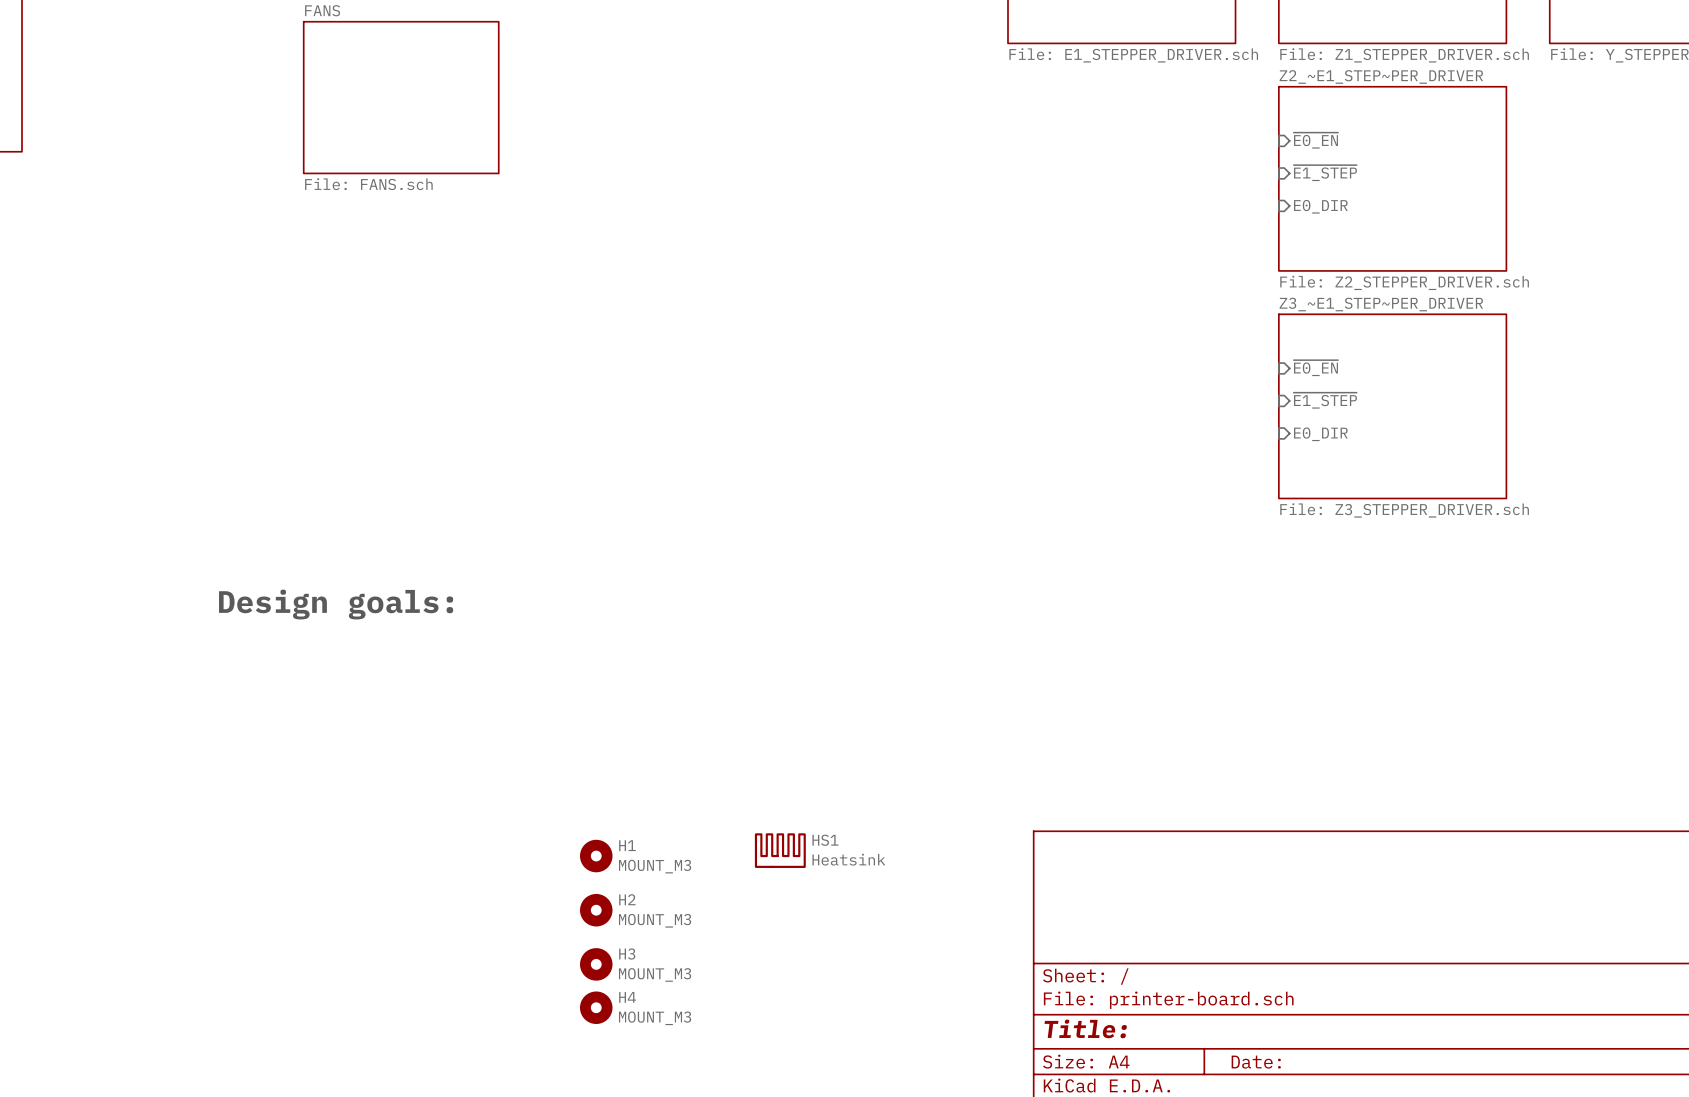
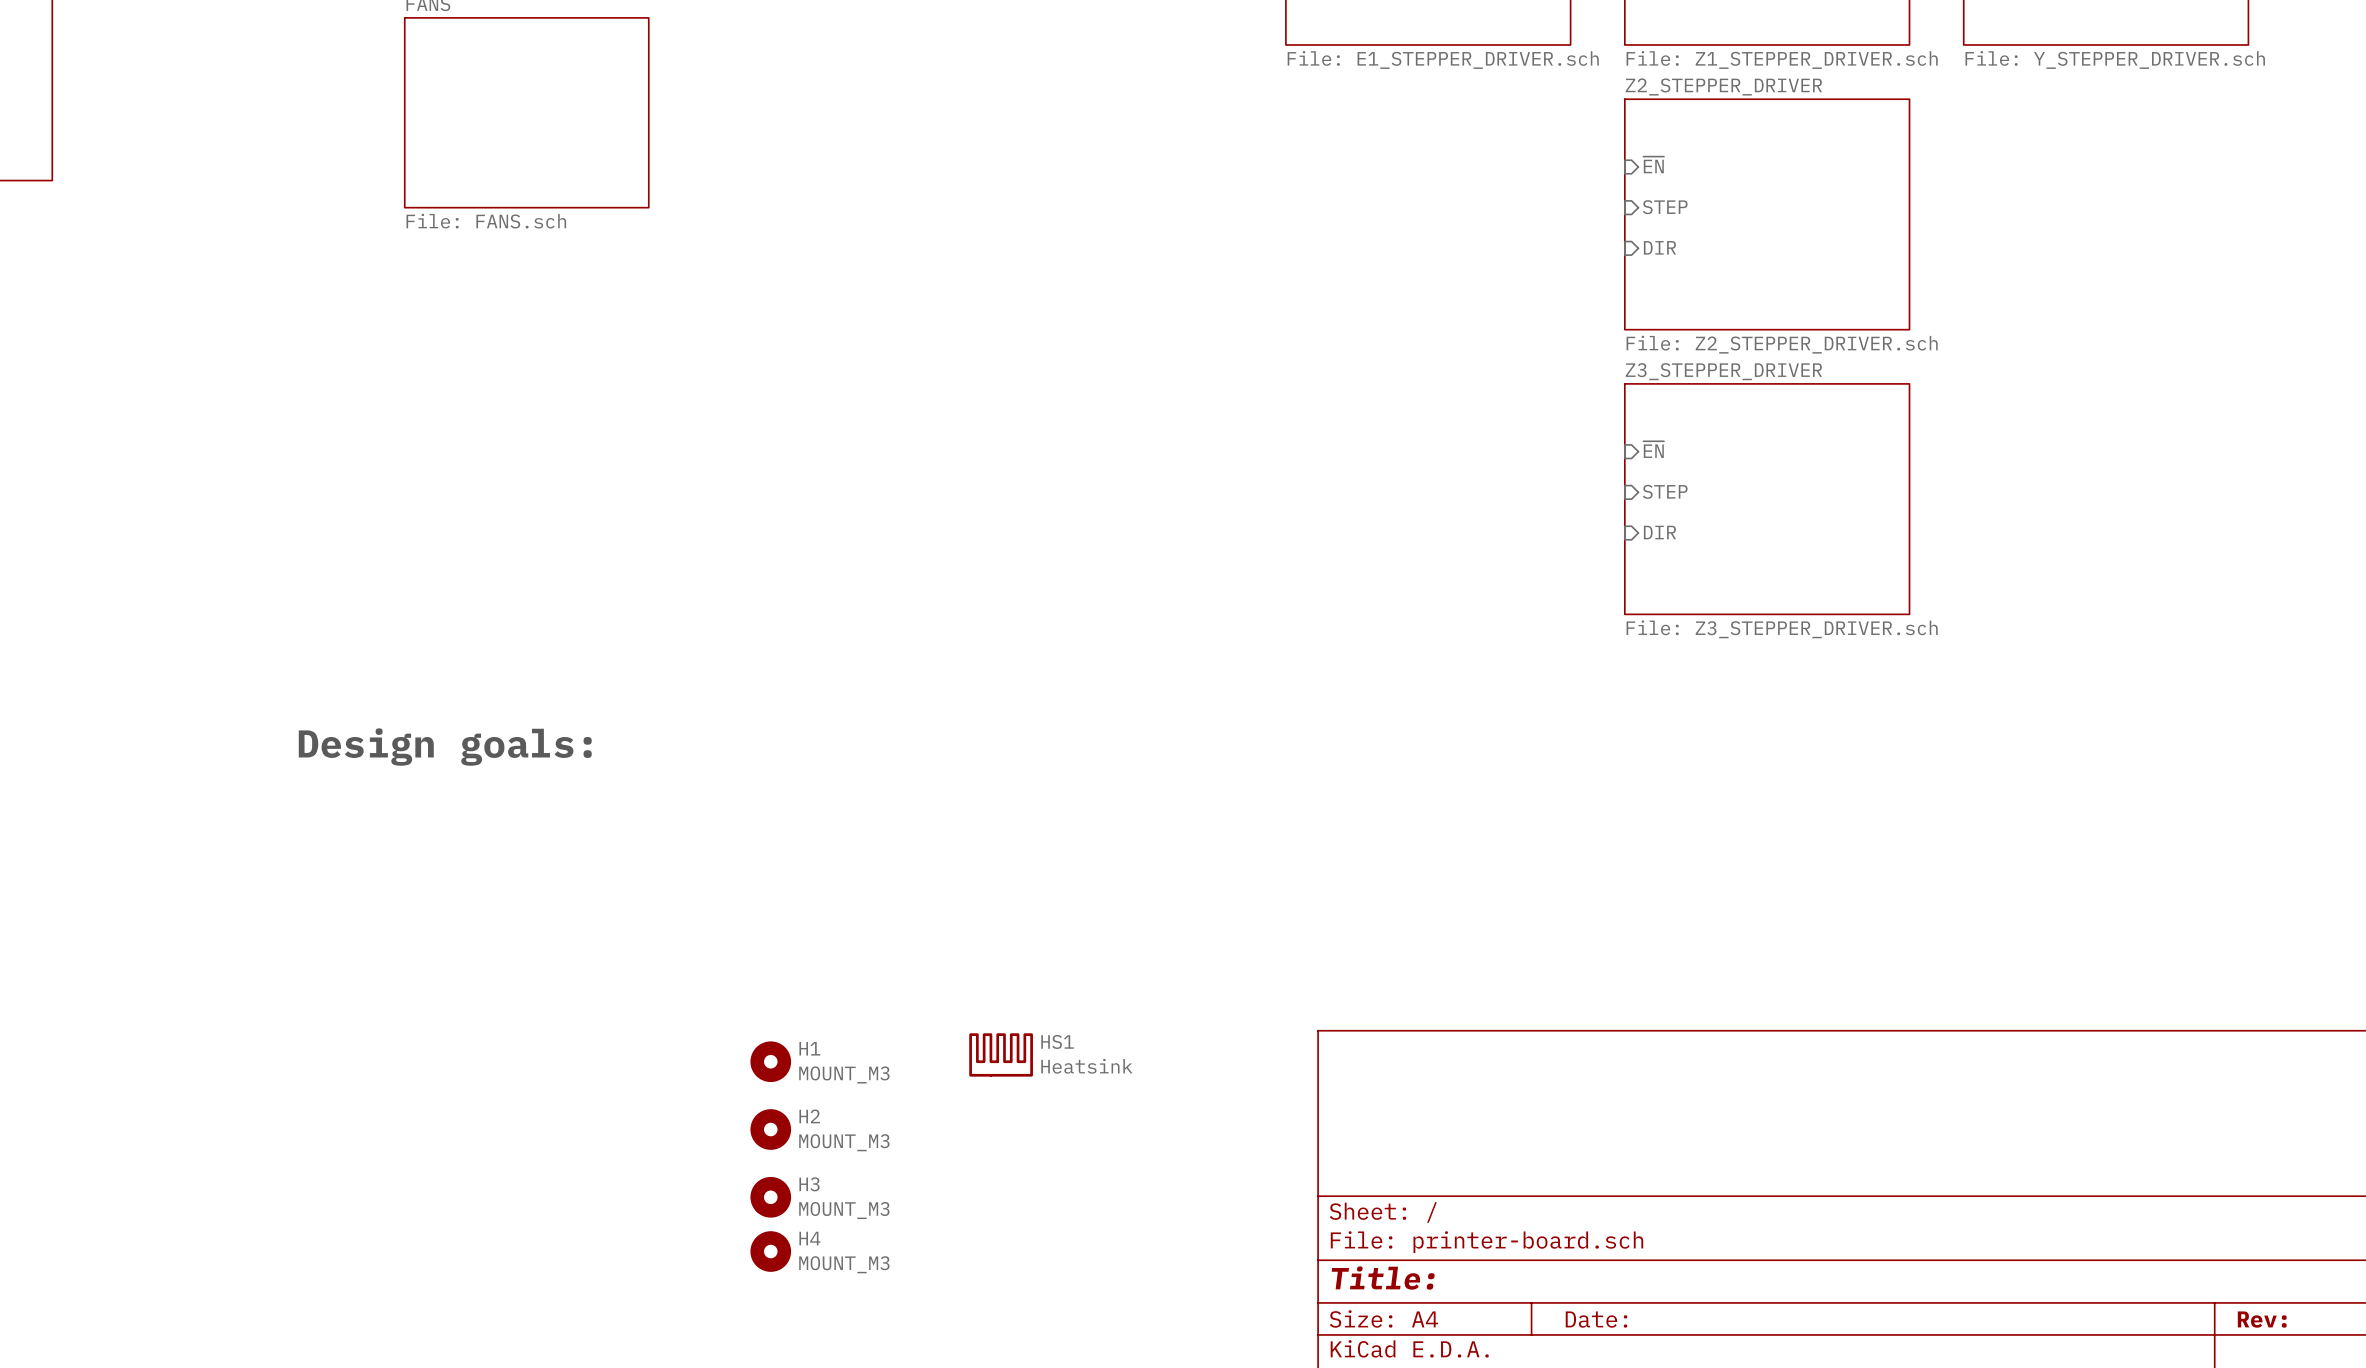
sheet Z2_~E1_STEP~PER_DRIVER name: Z2_~E1_STEP~PER_DRIVER (1381, 76) -> Z2_STEPPER_DRIVER (1723, 86)
sheet pin: ~{E0_EN} (1315, 140) -> ~{EN} (1653, 164)
sheet pin: ~{E1_STEP} (1325, 173) -> STEP (1665, 207)
sheet pin: E0_DIR (1320, 206) -> DIR (1659, 247)
sheet Z3_~E1_STEP~PER_DRIVER name: Z3_~E1_STEP~PER_DRIVER (1381, 304) -> Z3_STEPPER_DRIVER (1723, 371)
sheet pin: ~{E0_EN} (1315, 368) -> ~{EN} (1653, 449)
sheet pin: ~{E1_STEP} (1325, 400) -> STEP (1665, 491)
sheet pin: E0_DIR (1320, 434) -> DIR (1659, 532)

